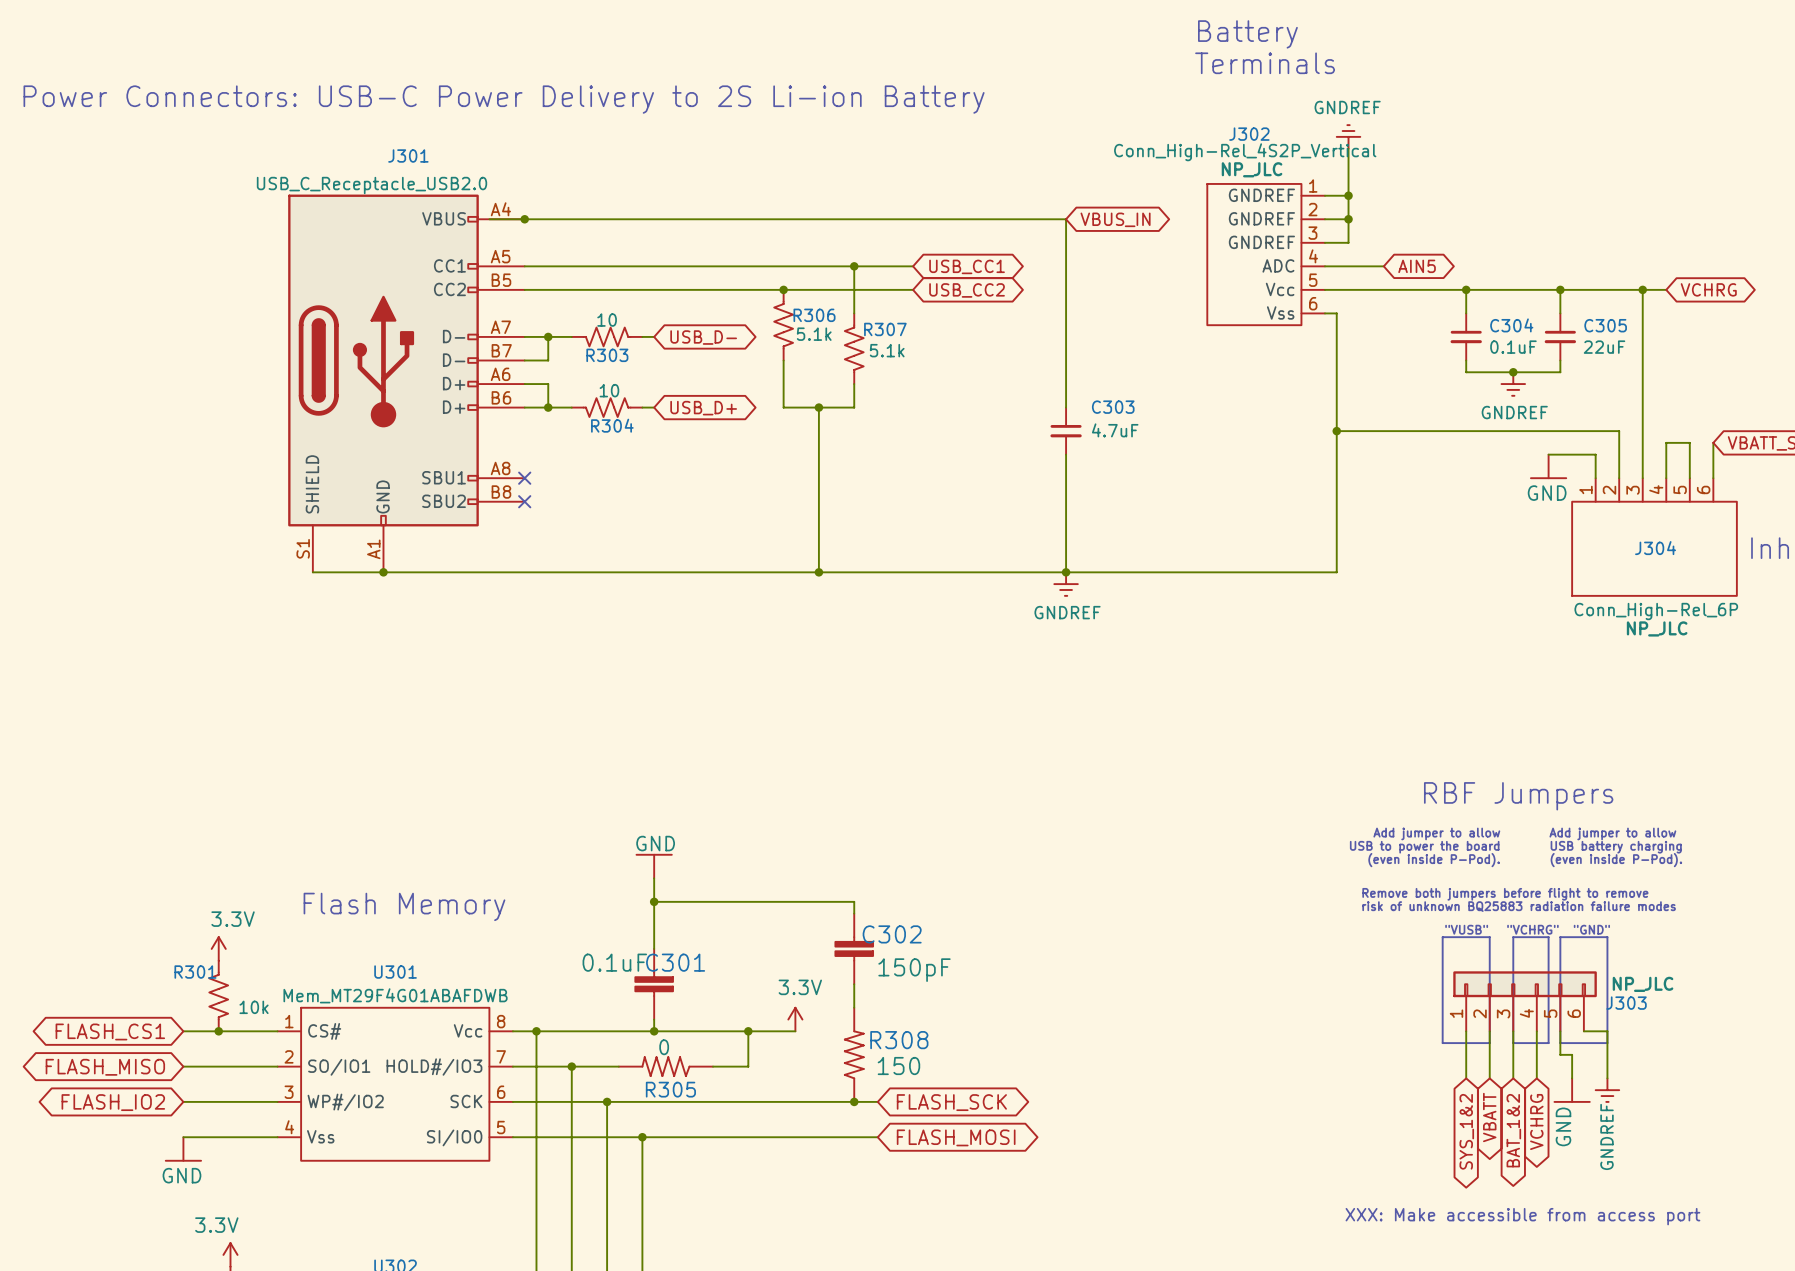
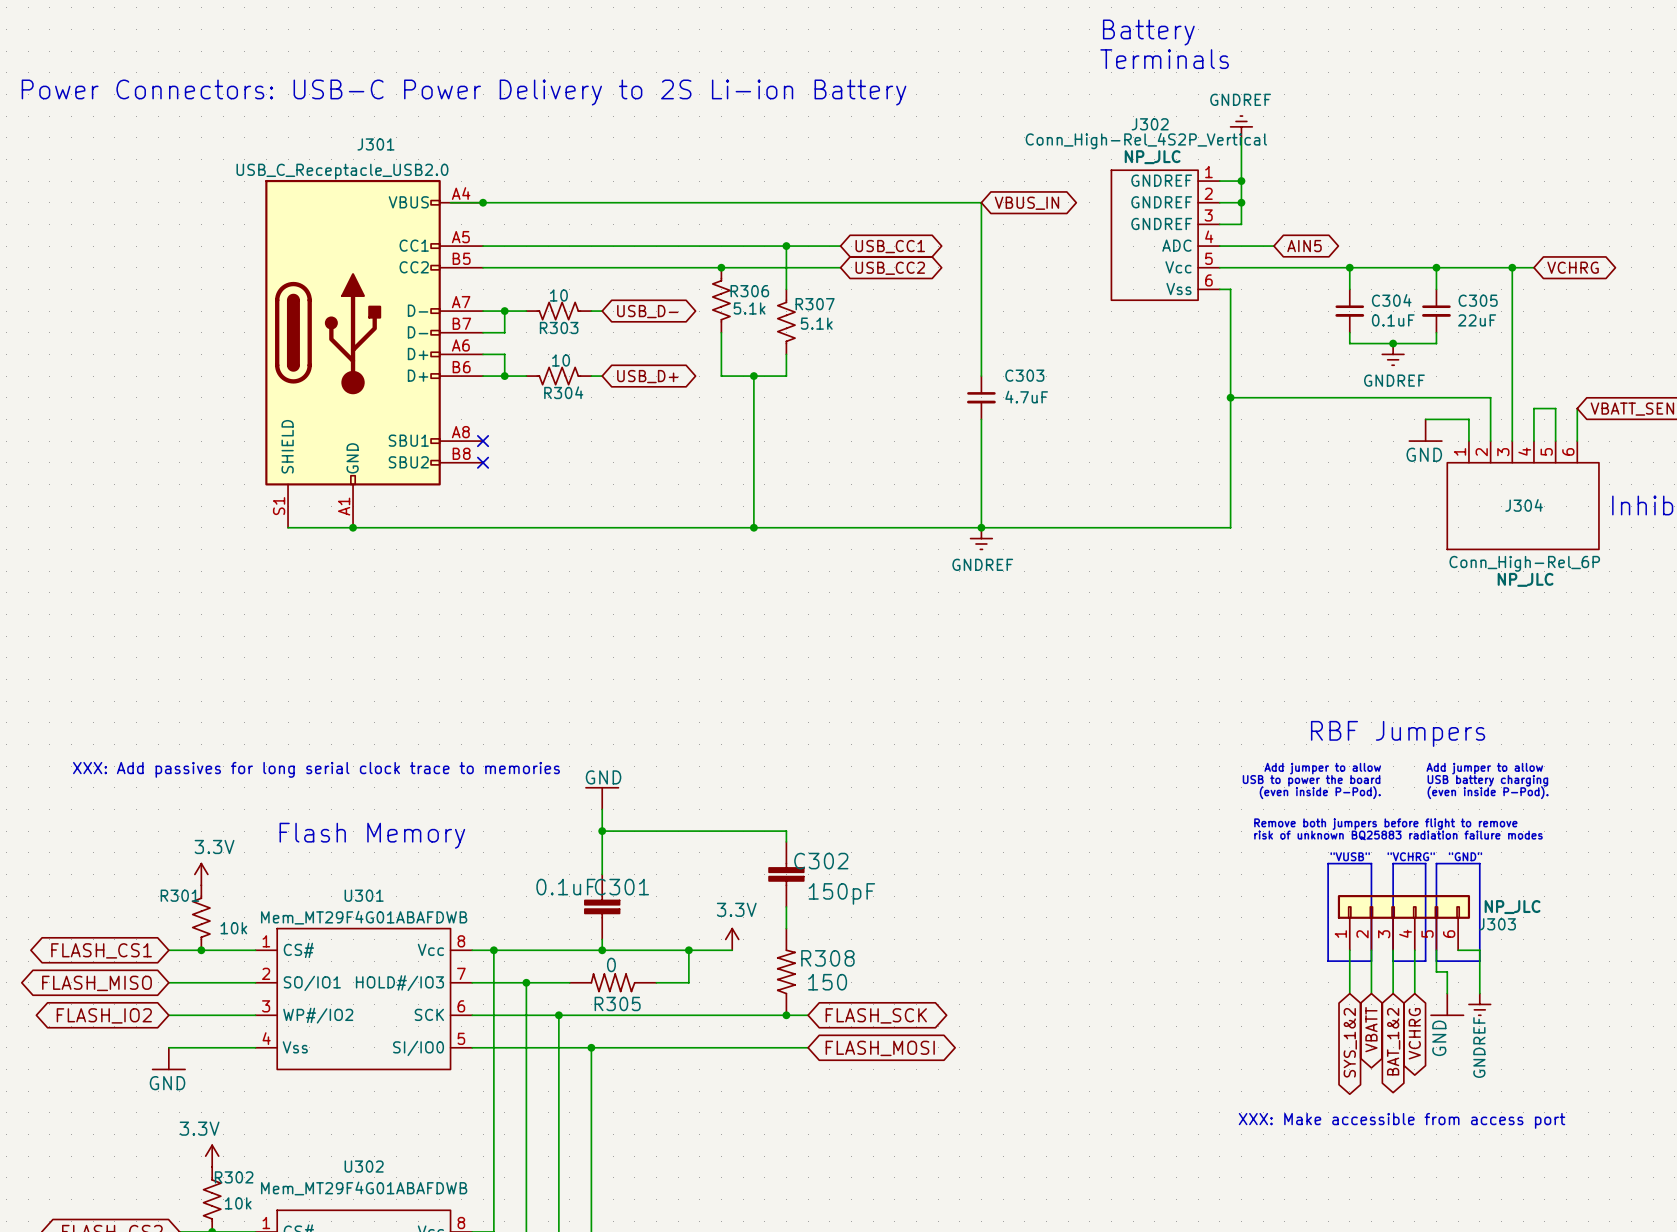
text: none -> XXX: Add passives for long serial clock trace to memories (316, 769)

